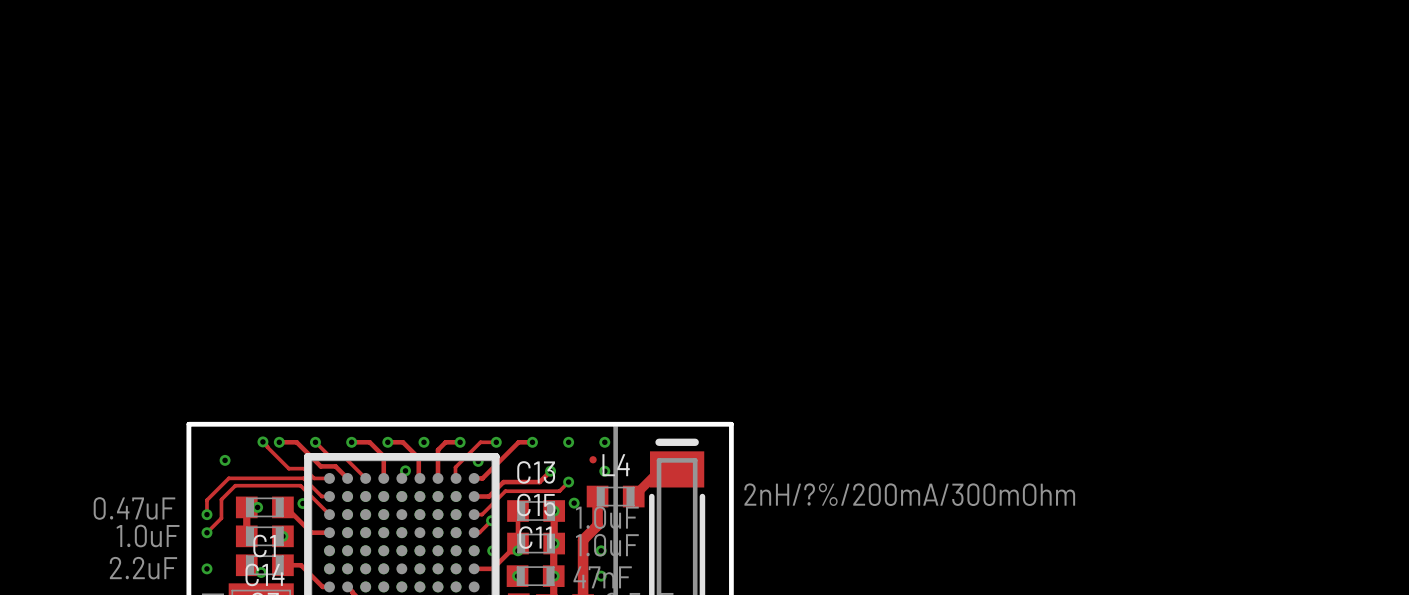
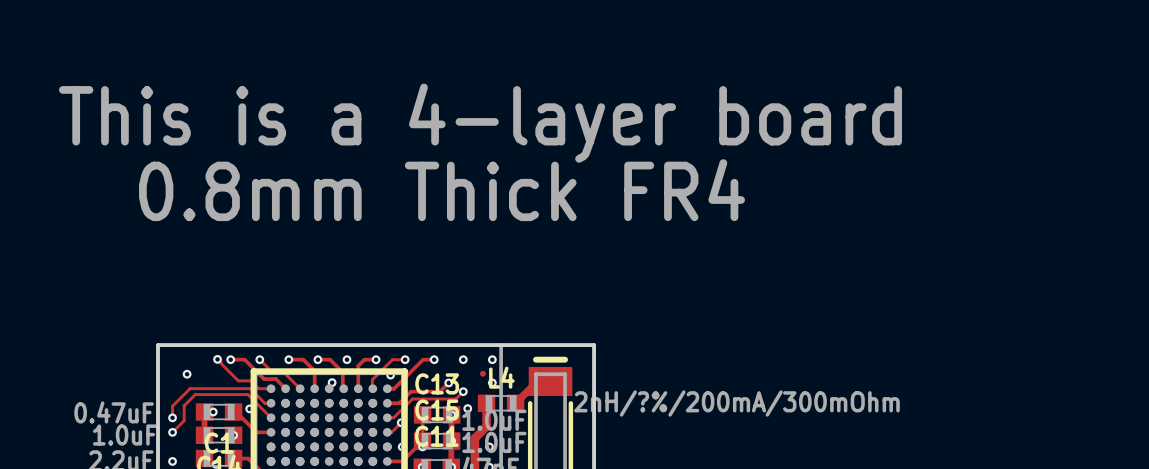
text: none -> This is a 4-layer board (480, 123)
text: none -> 0.8mm Thick FR4 (441, 190)

